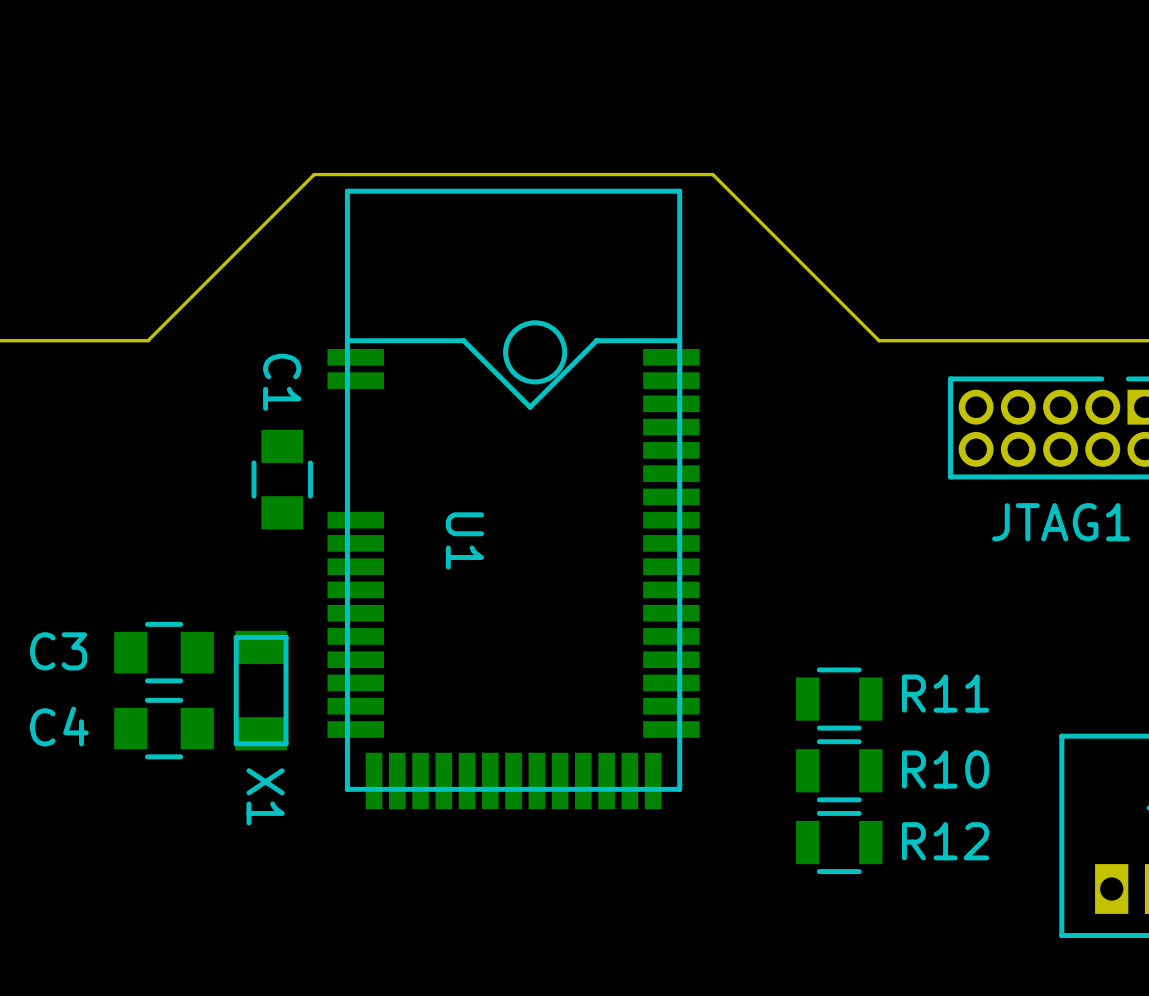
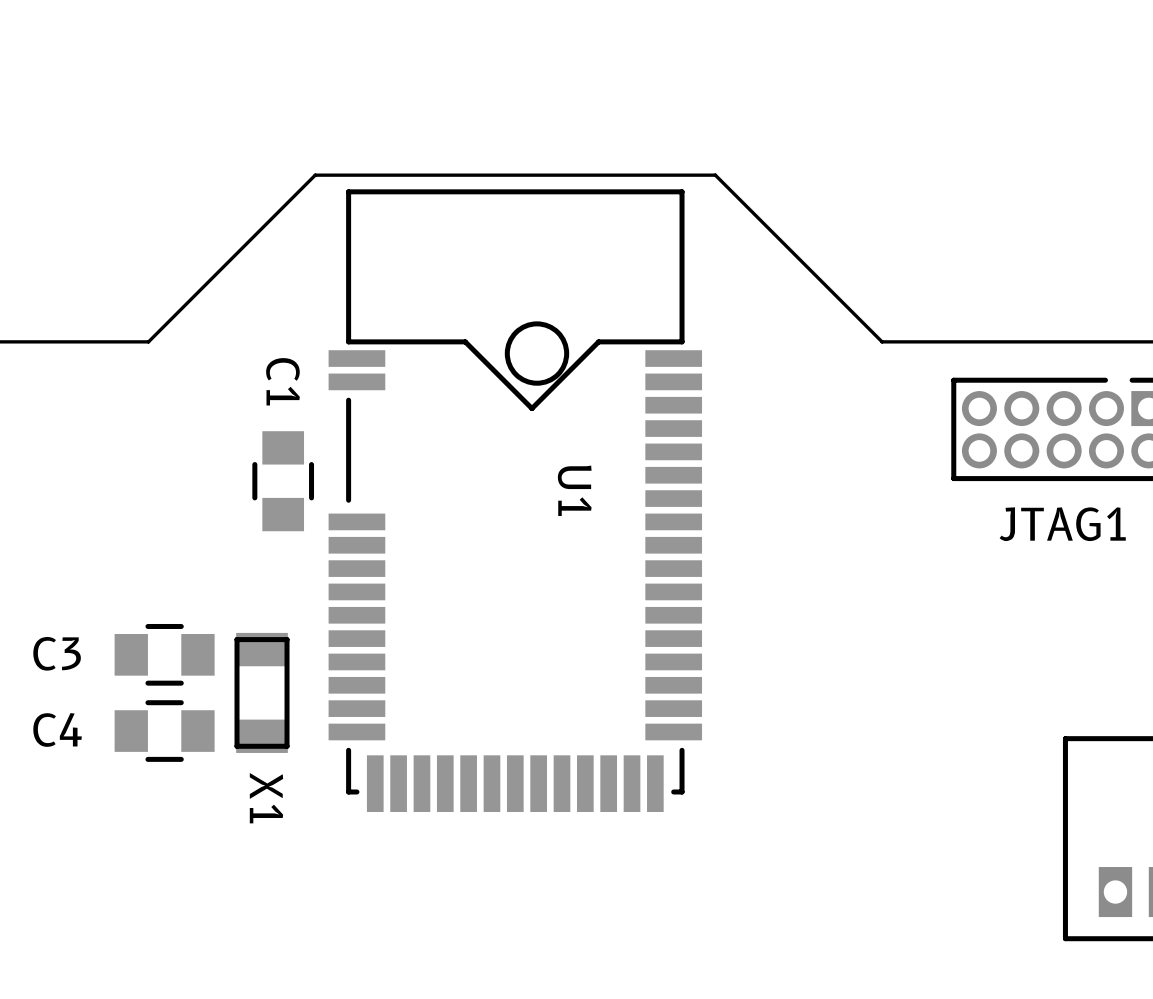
U1 footprint: [327, 188, 700, 810] -> [328, 189, 703, 813]
U1 name position: U1 (464, 540) -> U1 (574, 490)
R11: (839, 699) -> none
R10: (839, 770) -> none
R12: (839, 842) -> none

